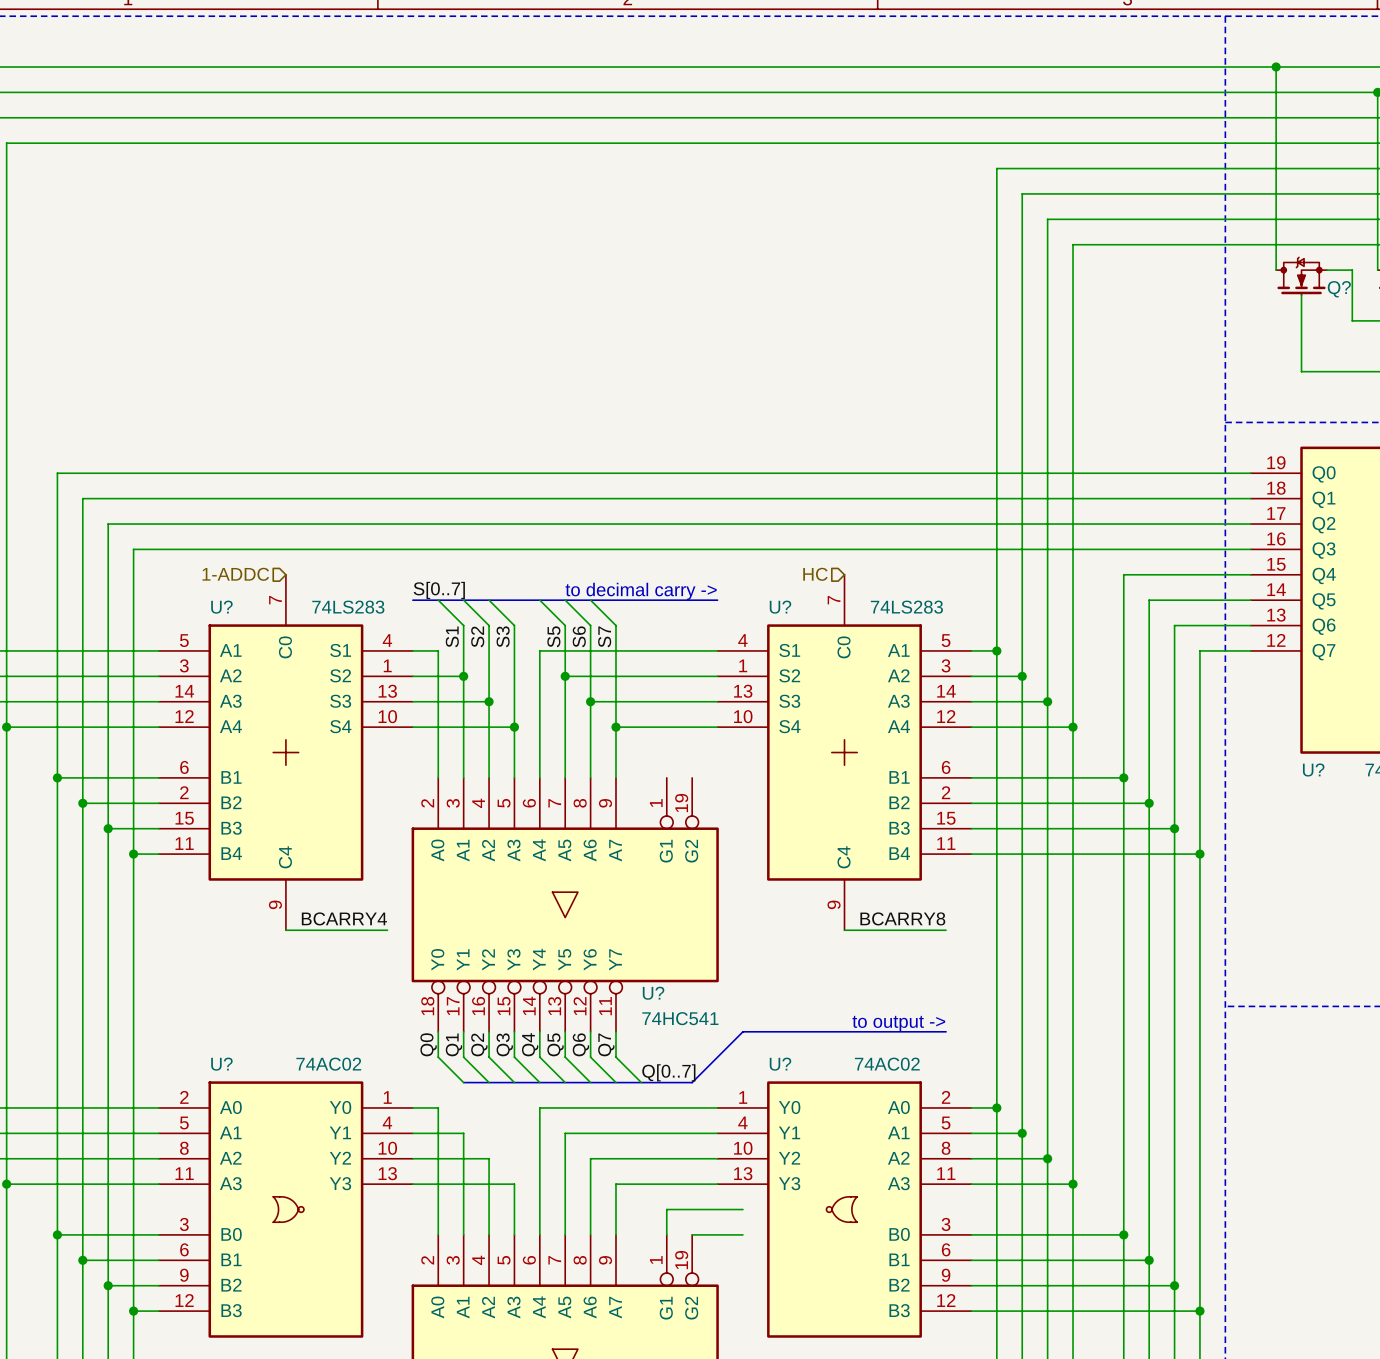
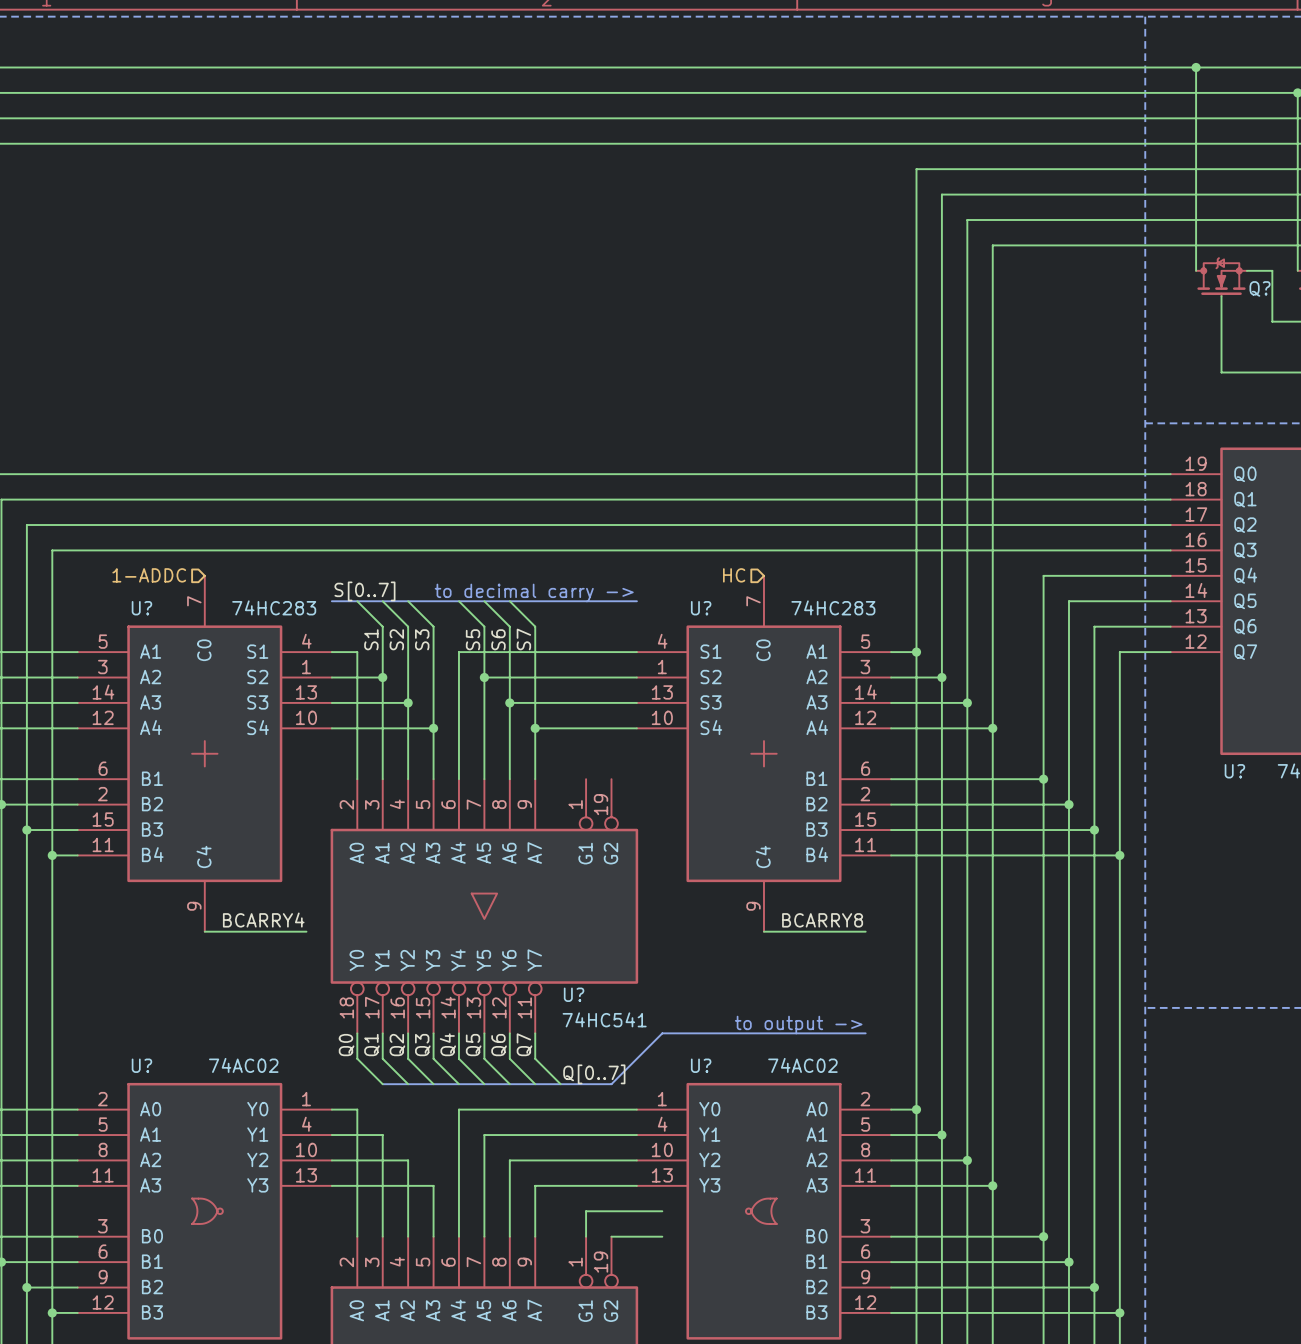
U? value: 74LS283 (348, 607) -> 74HC283 (274, 607)
U? value: 74LS283 (906, 607) -> 74HC283 (833, 607)

